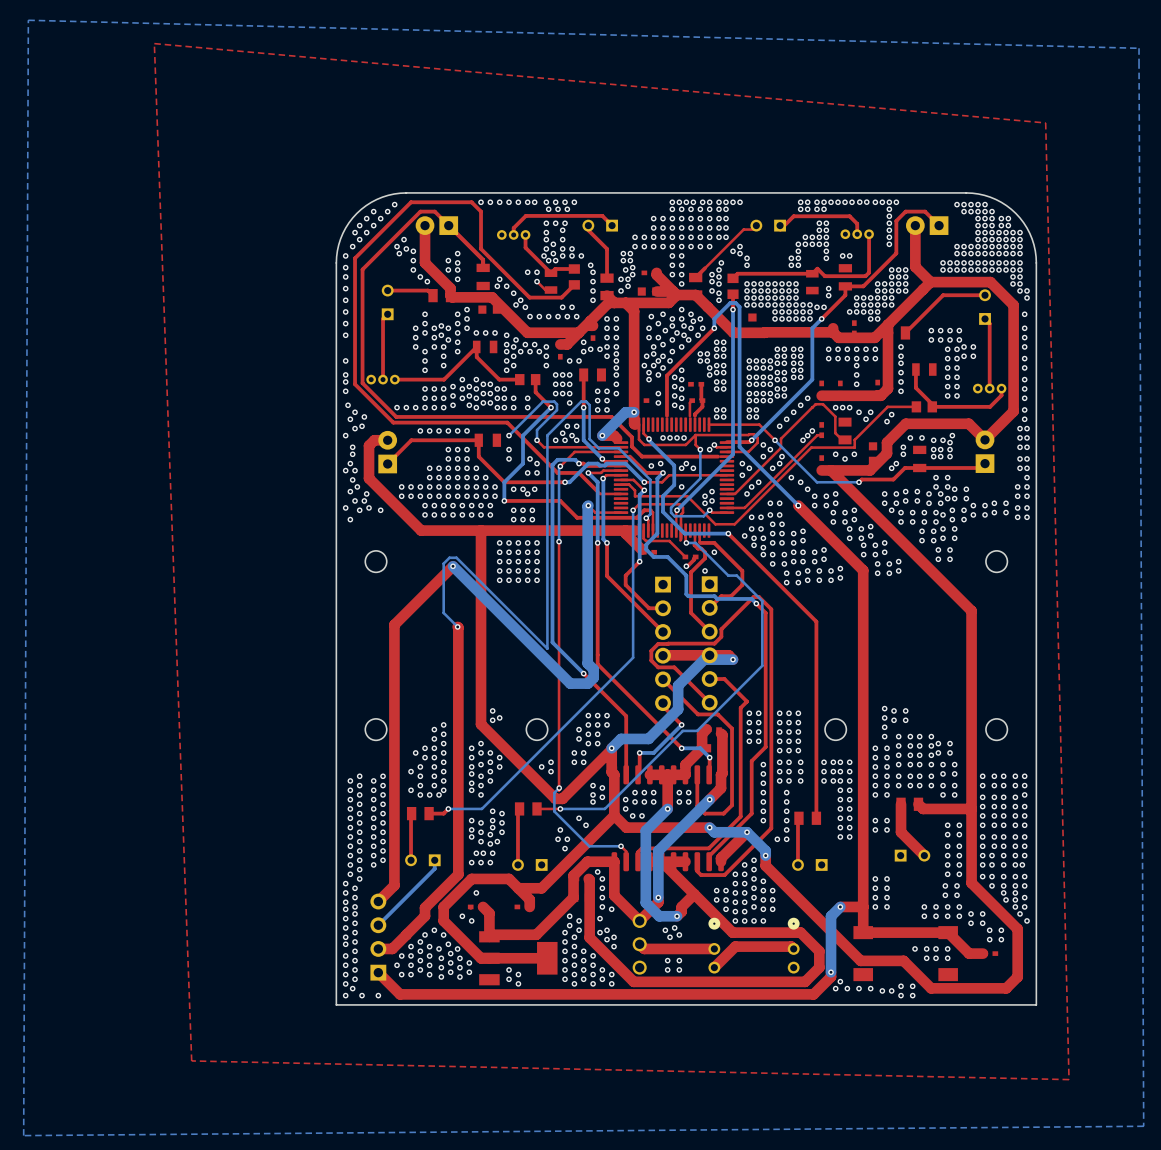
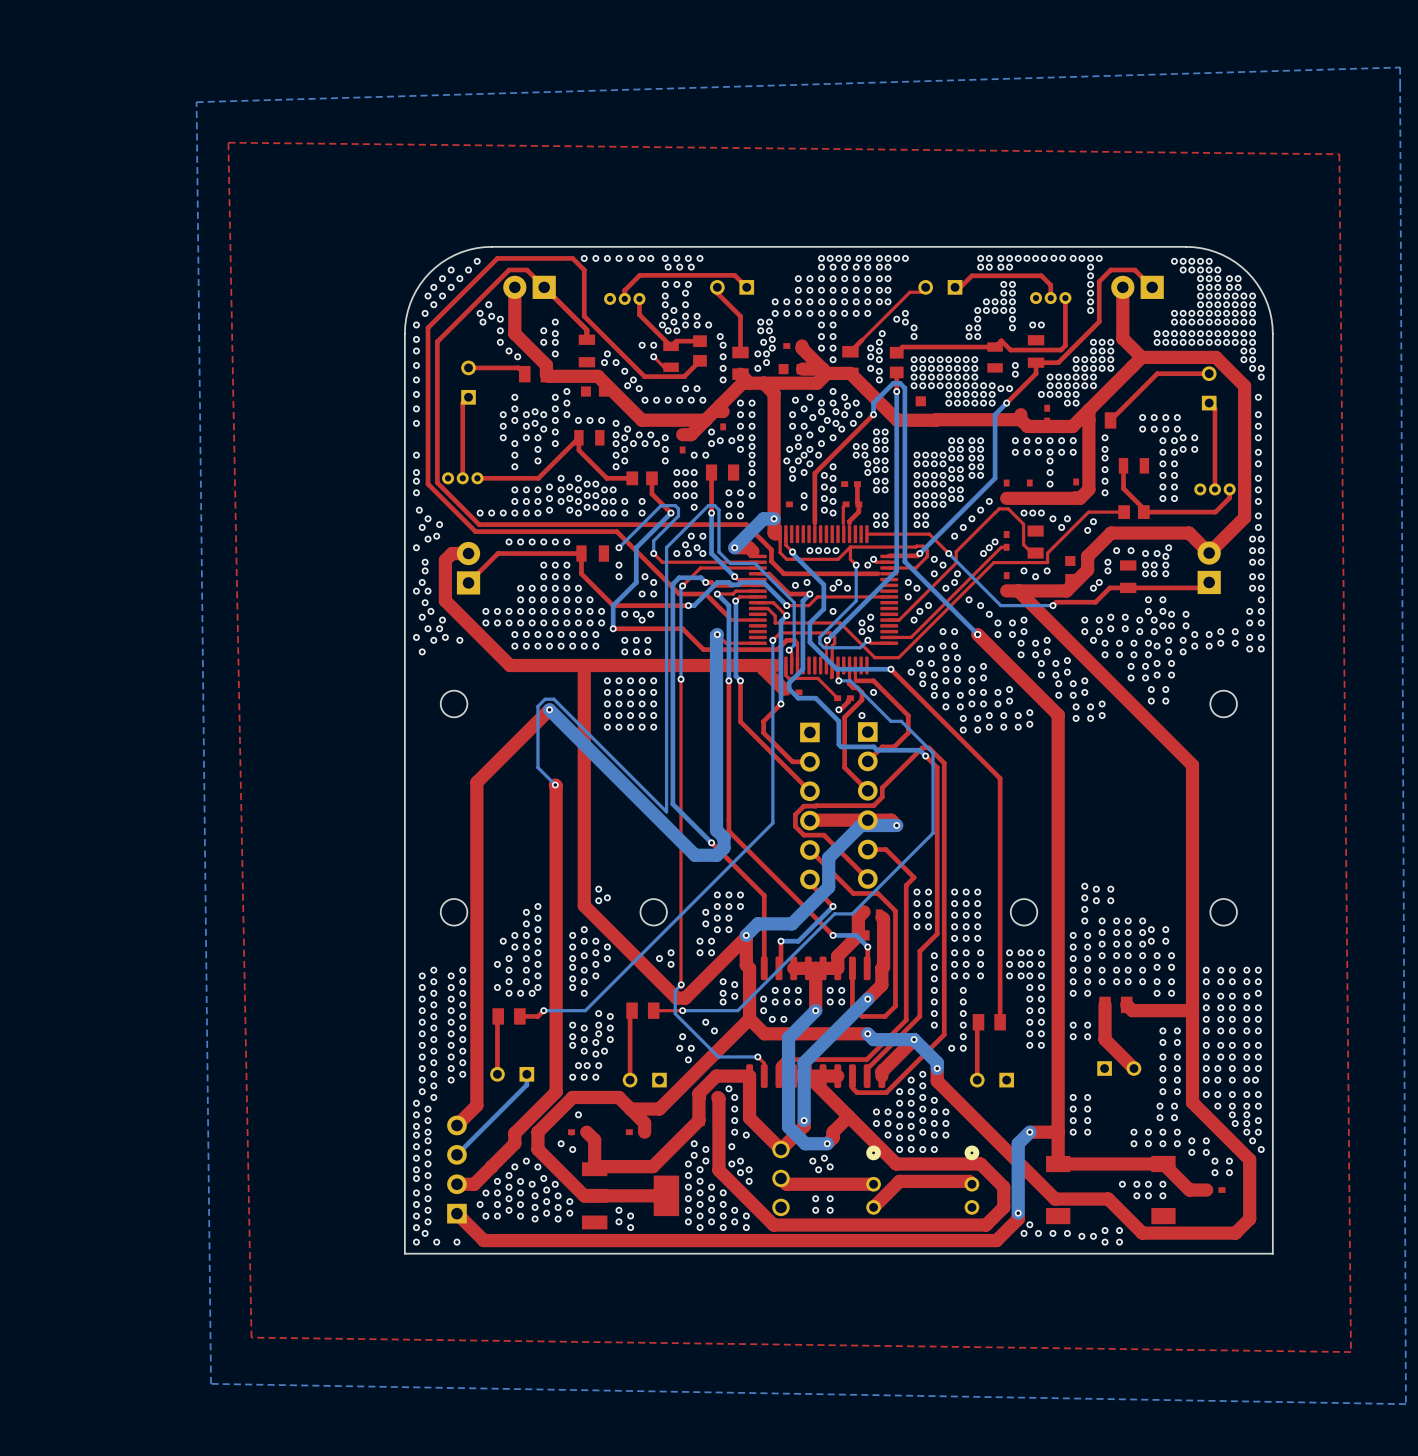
top zone outline: (154, 43) (191, 1060) (1069, 1079) (1045, 122) (154, 43) -> (228, 142) (1339, 154) (1350, 1352) (251, 1337) (228, 142)
bottom zone outline: (1139, 48) (28, 20) (23, 1135) (1143, 1126) -> (1400, 67) (196, 102) (211, 1383) (1405, 1404)

